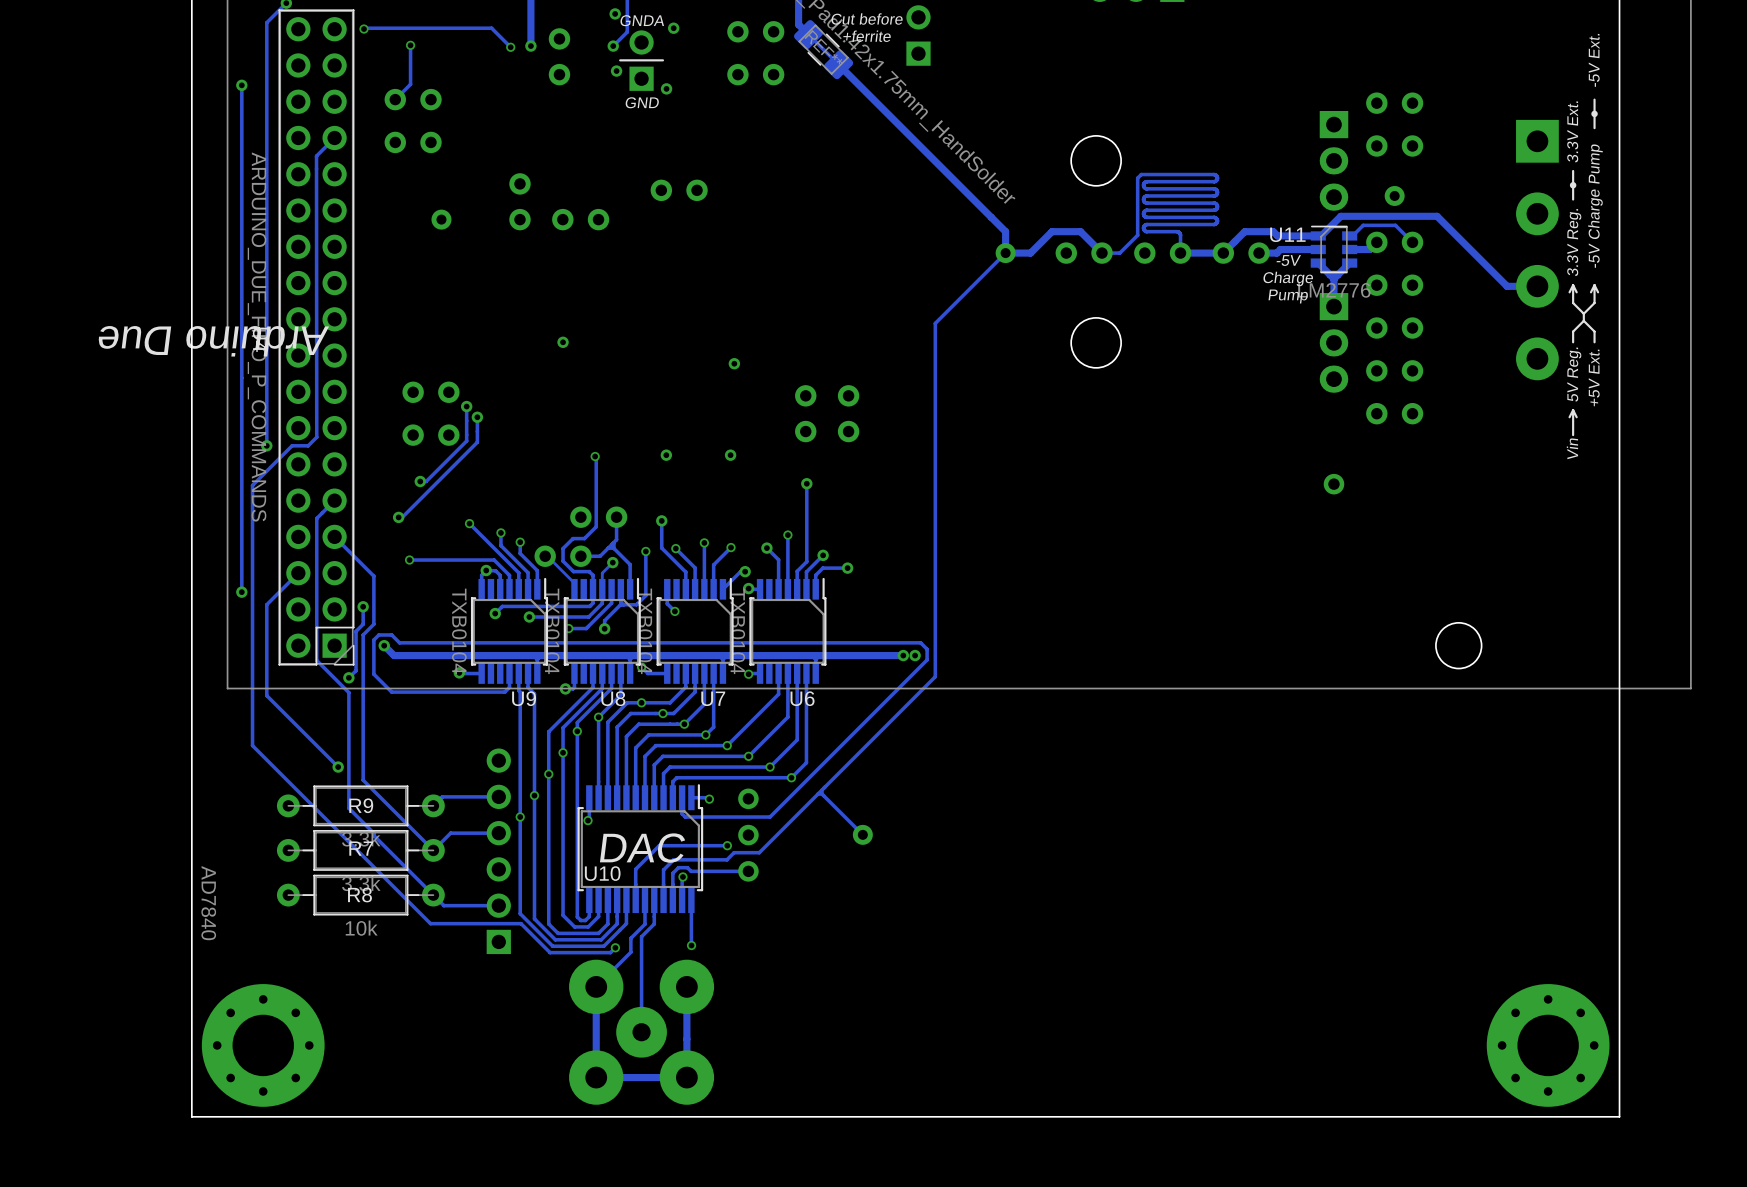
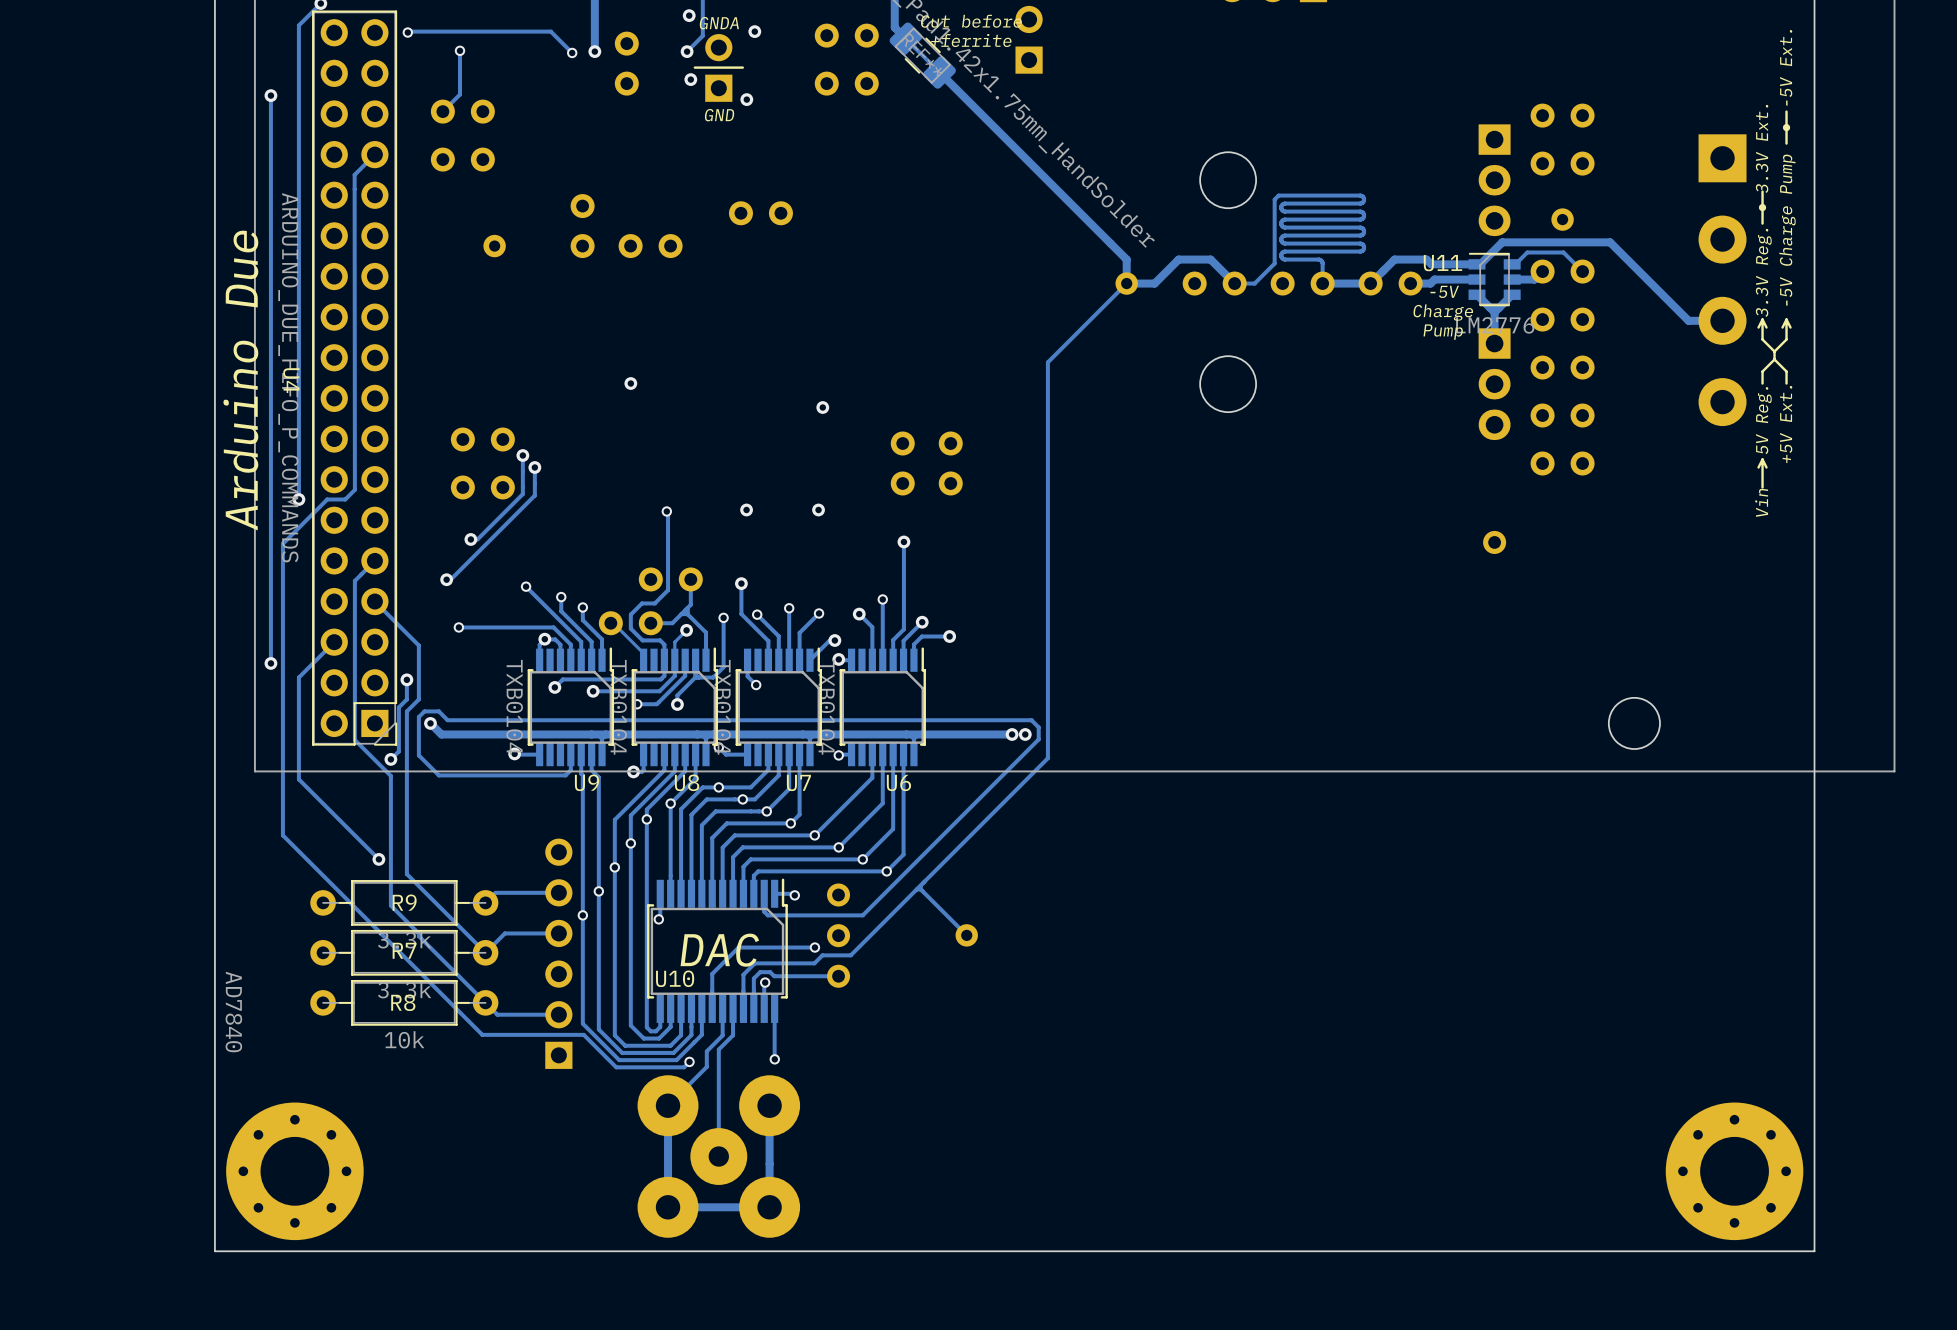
text rotation: 0° (213, 341) -> 90° clockwise (240, 380)

